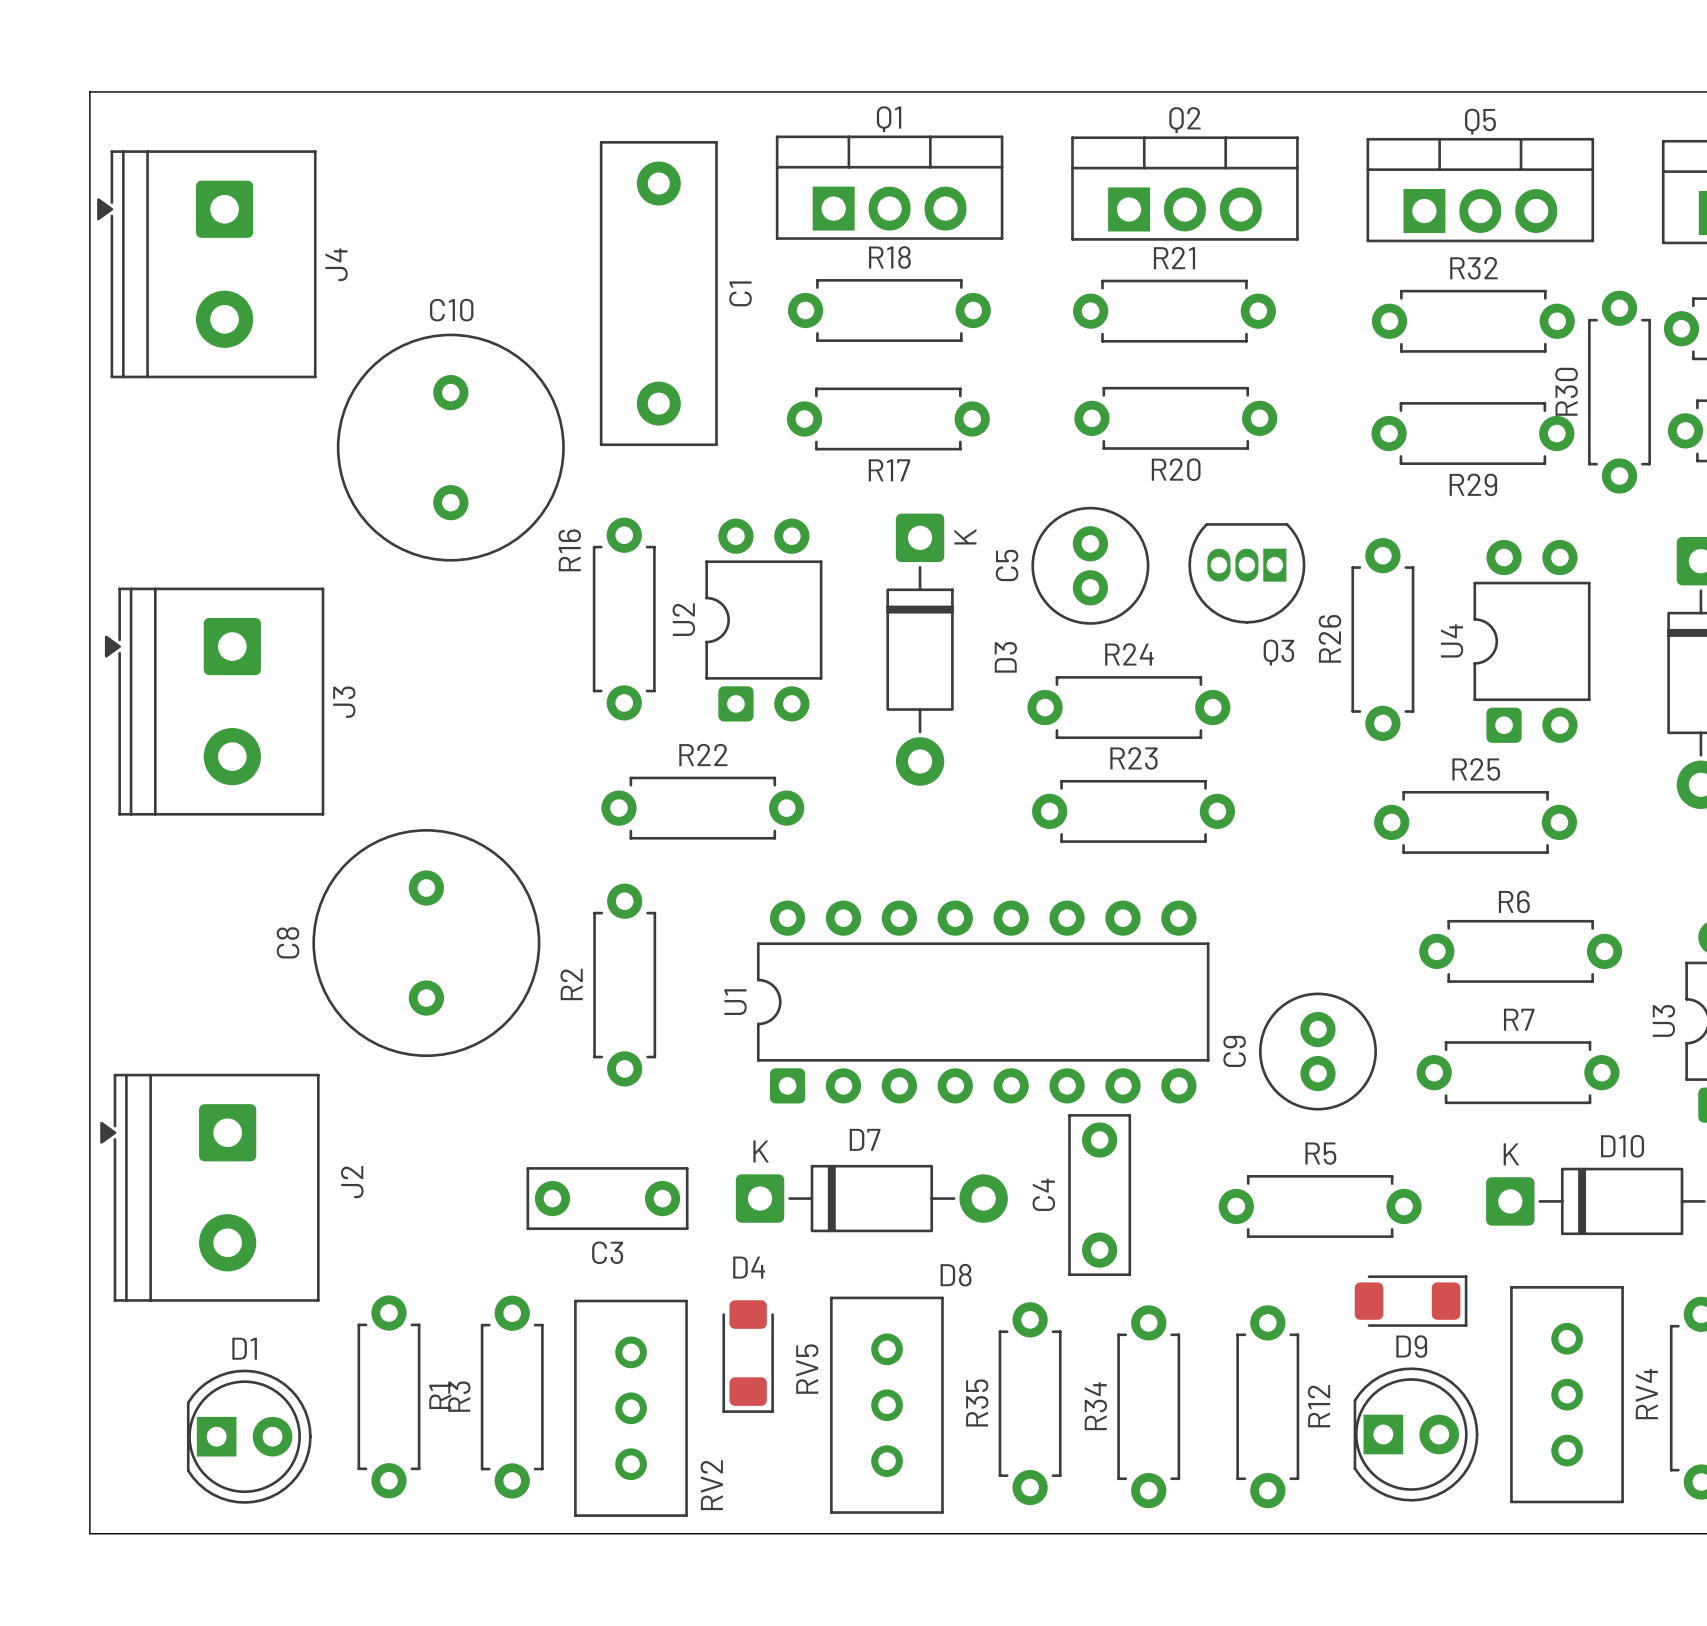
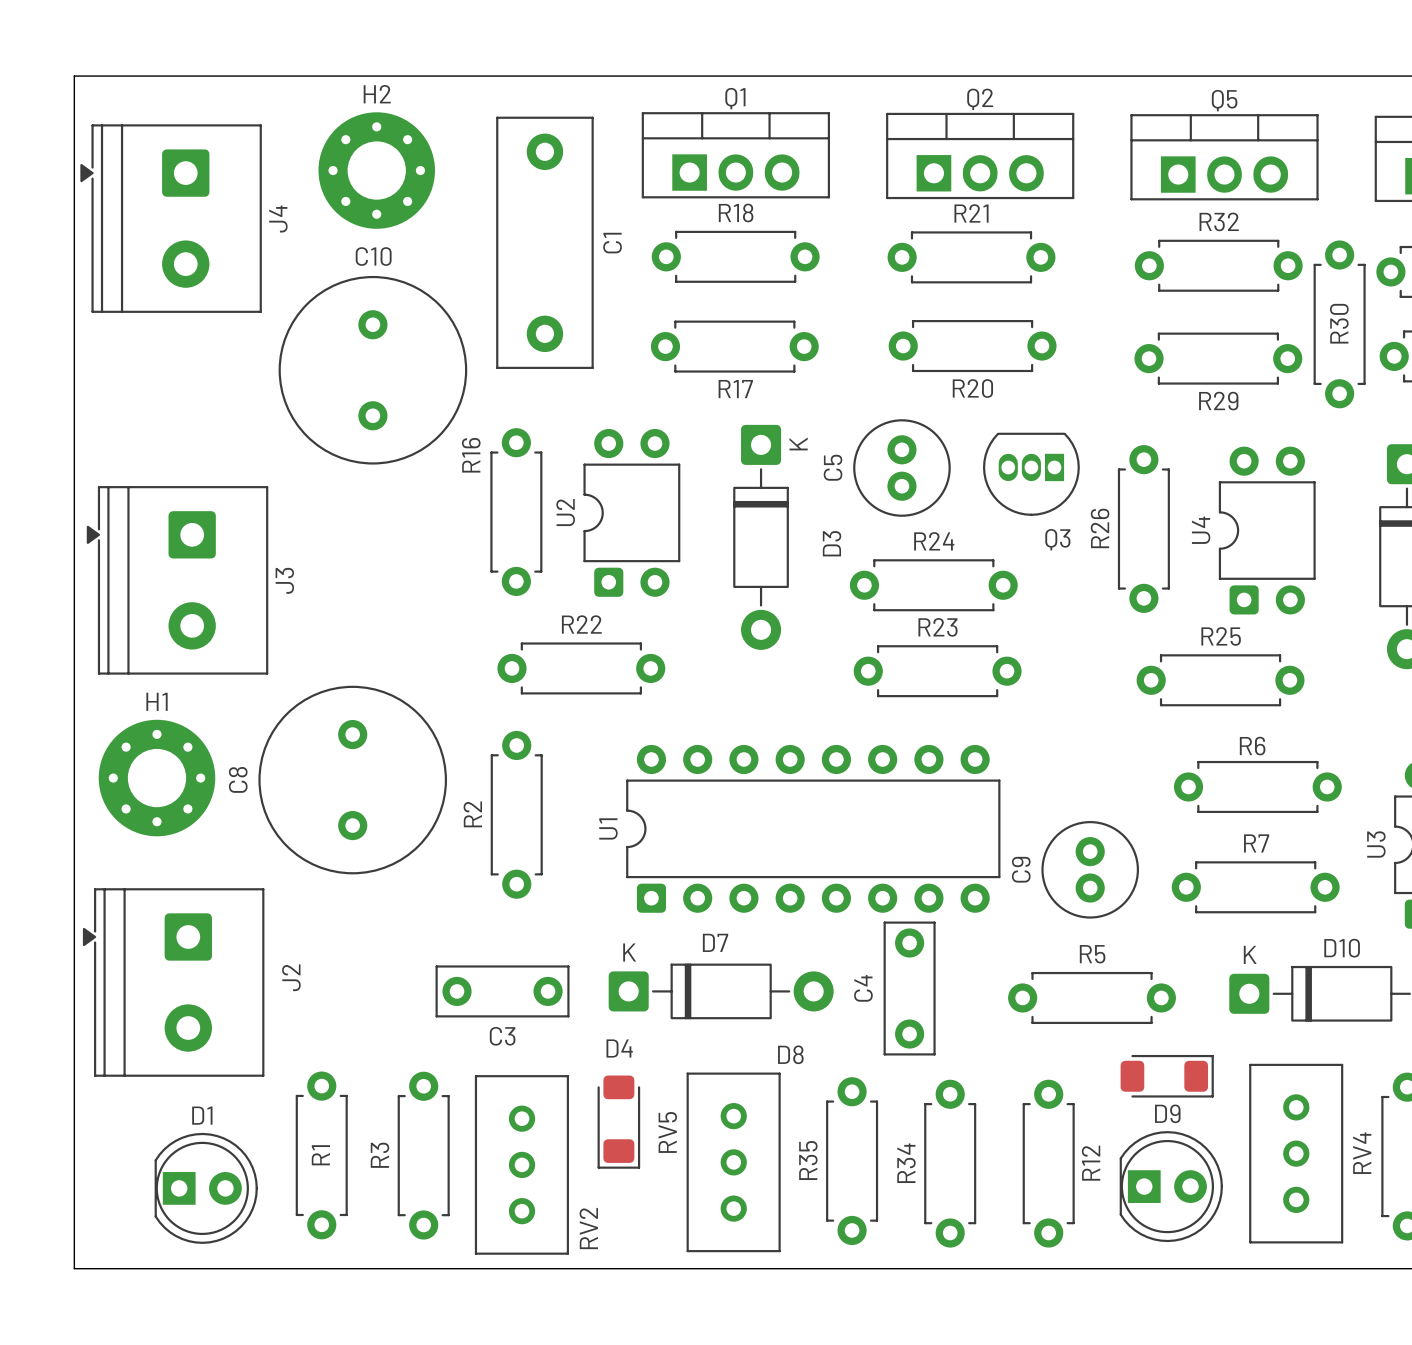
H2: none -> (376, 170)
R30 name position: R30 (1566, 391) -> R30 (1339, 323)
H1: none -> (156, 778)
R1 name position: R1 (440, 1396) -> R1 (320, 1155)

